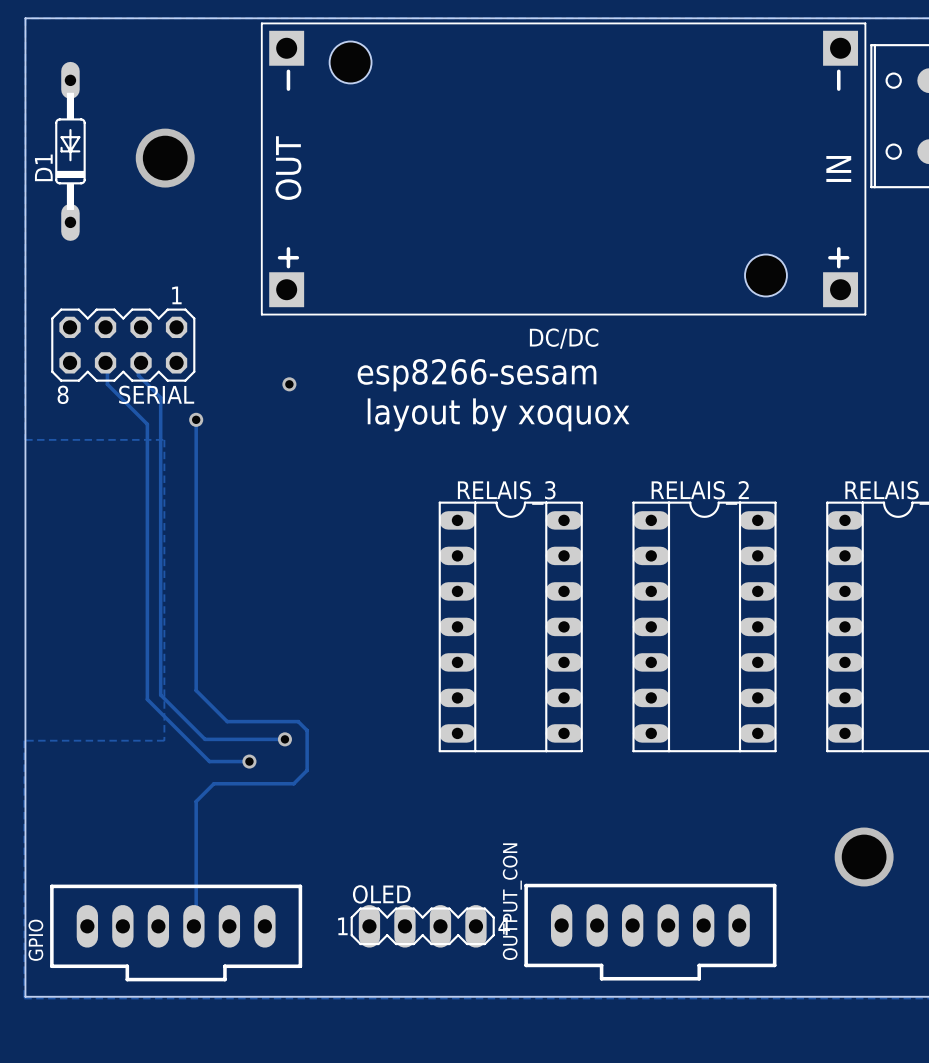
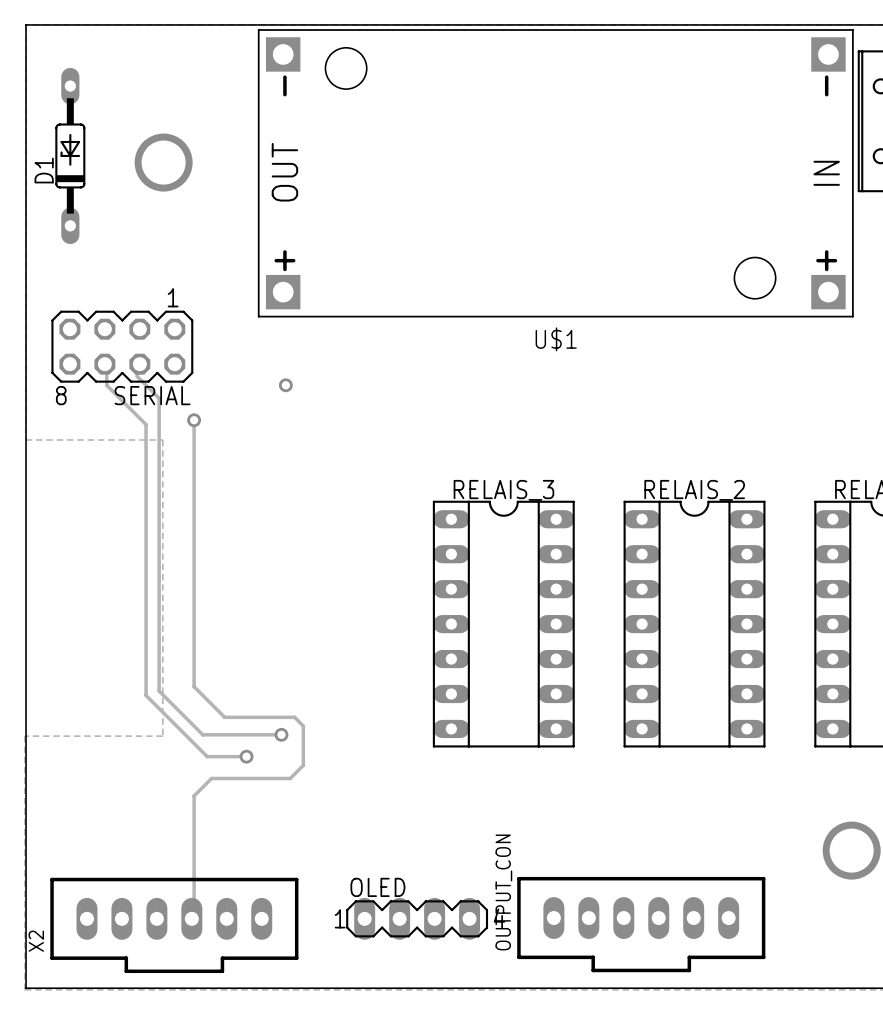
DC/DC name: DC/DC (564, 338) -> U$1 (556, 339)
text: esp8266-sesam (477, 375) -> none
text: layout by xoquox (498, 414) -> none
GPIO name: GPIO (35, 940) -> X2 (36, 941)

